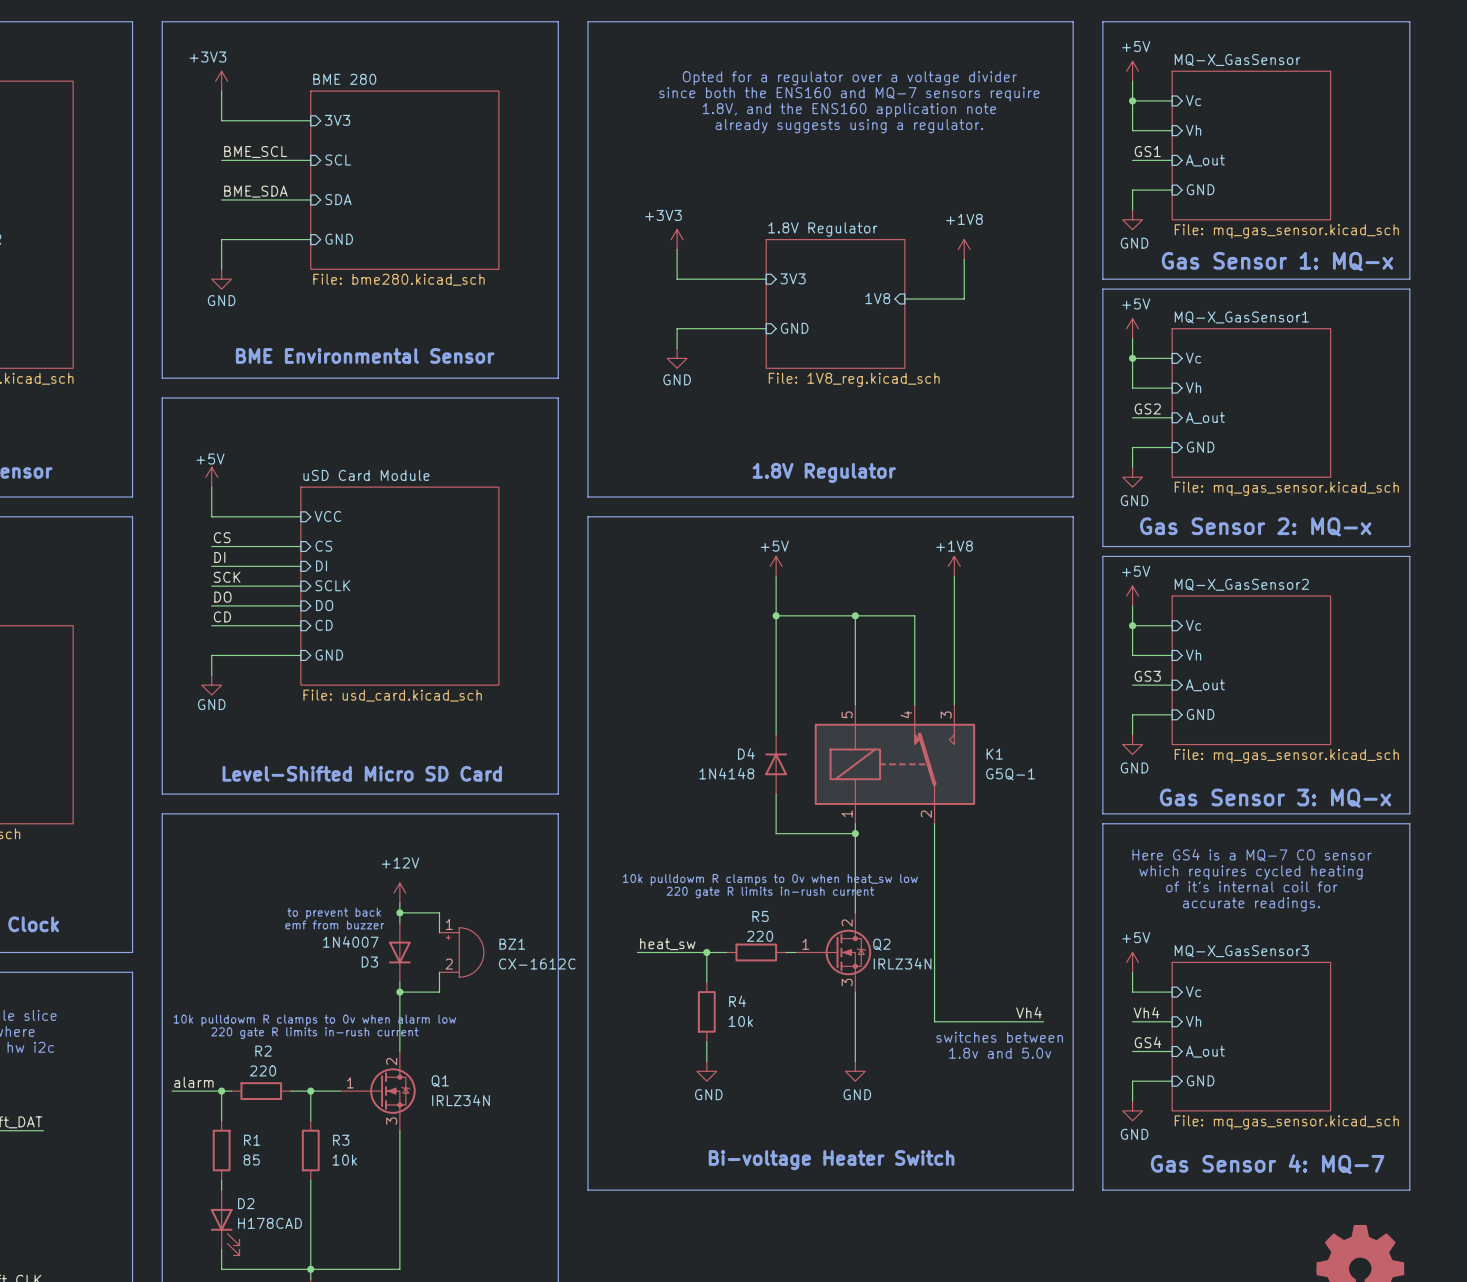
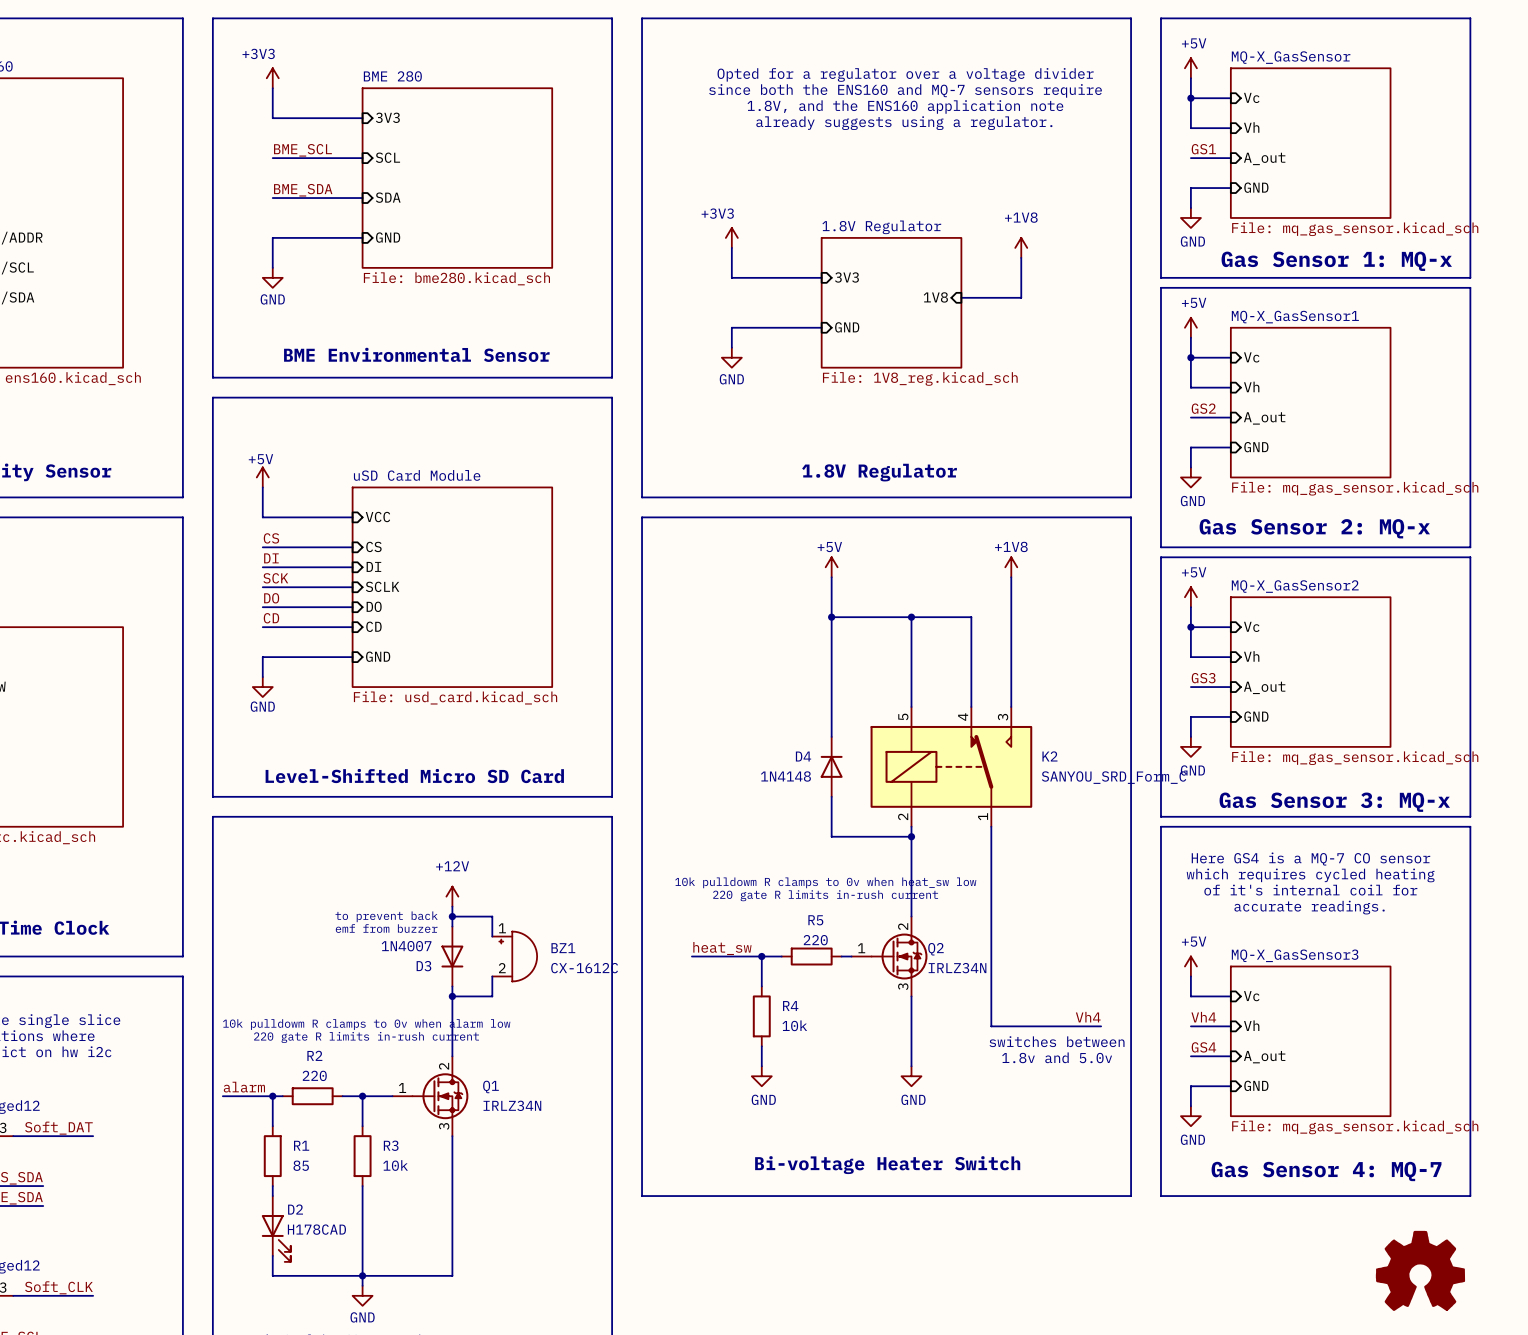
K1 name: K1 (994, 754) -> K2 (1049, 756)
K1 value: G5Q-1 (1010, 774) -> SANYOU_SRD_Form_C (1114, 777)
K1 pin number: 1 (847, 813) -> 2 (903, 816)
K1 pin number: 2 (926, 814) -> 1 (983, 816)

